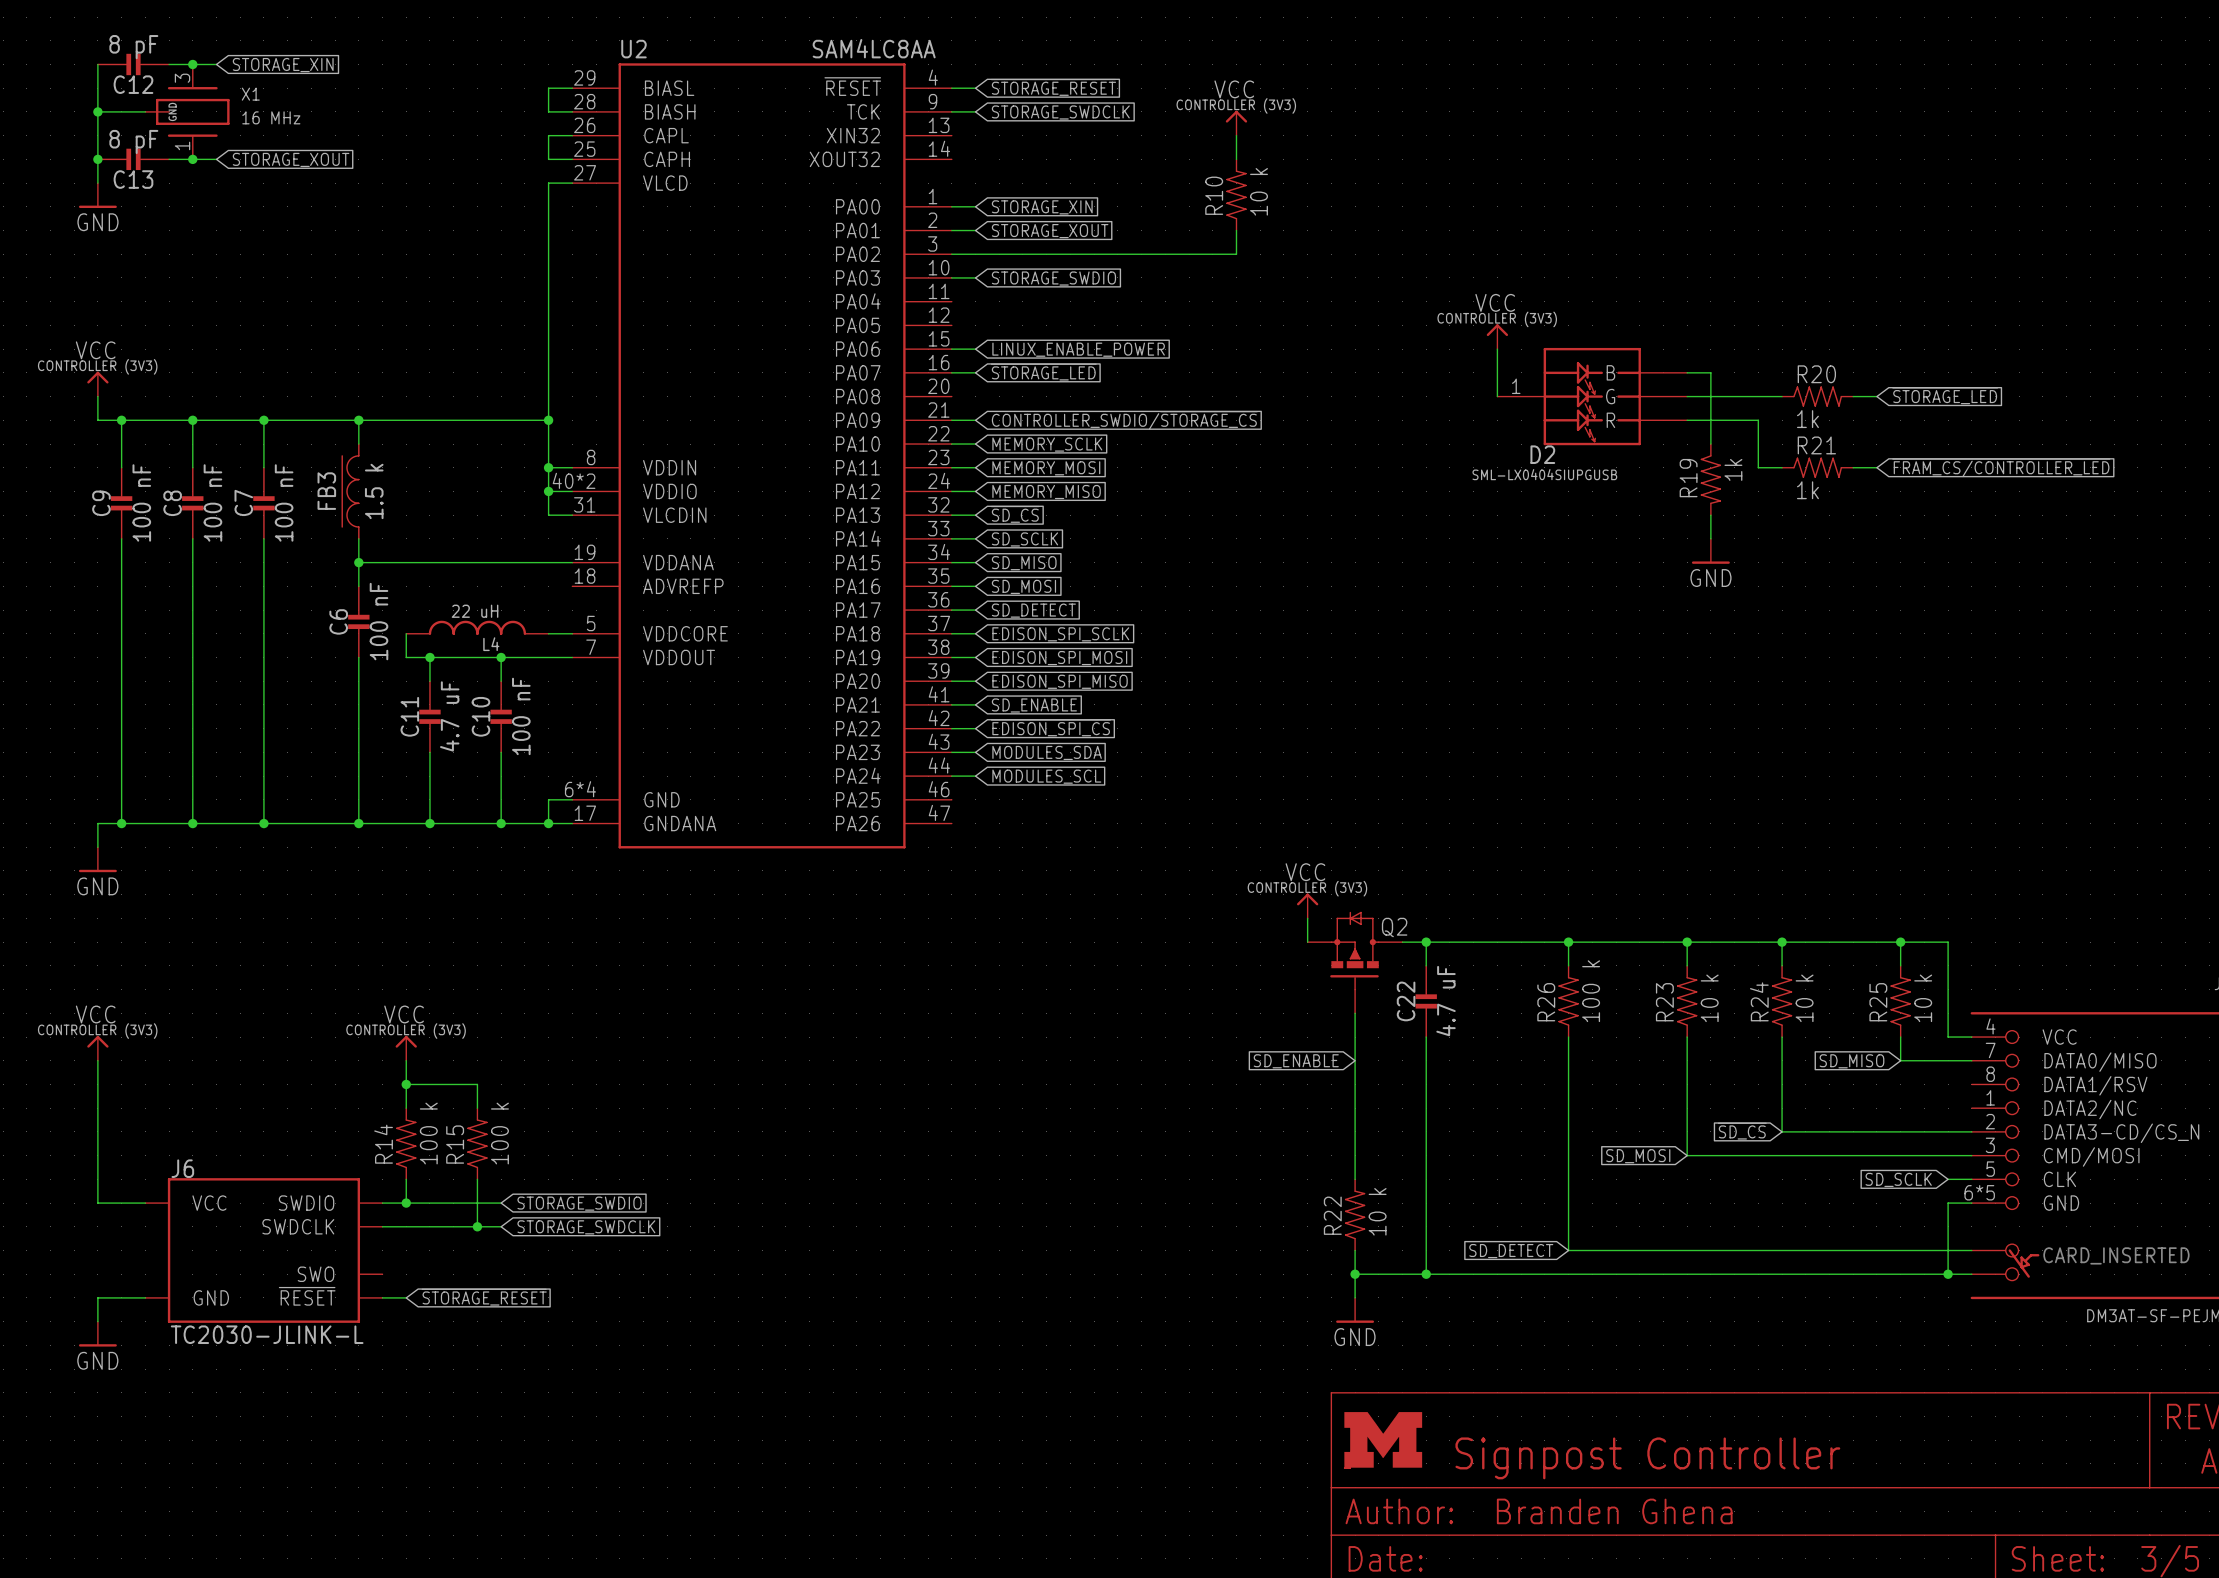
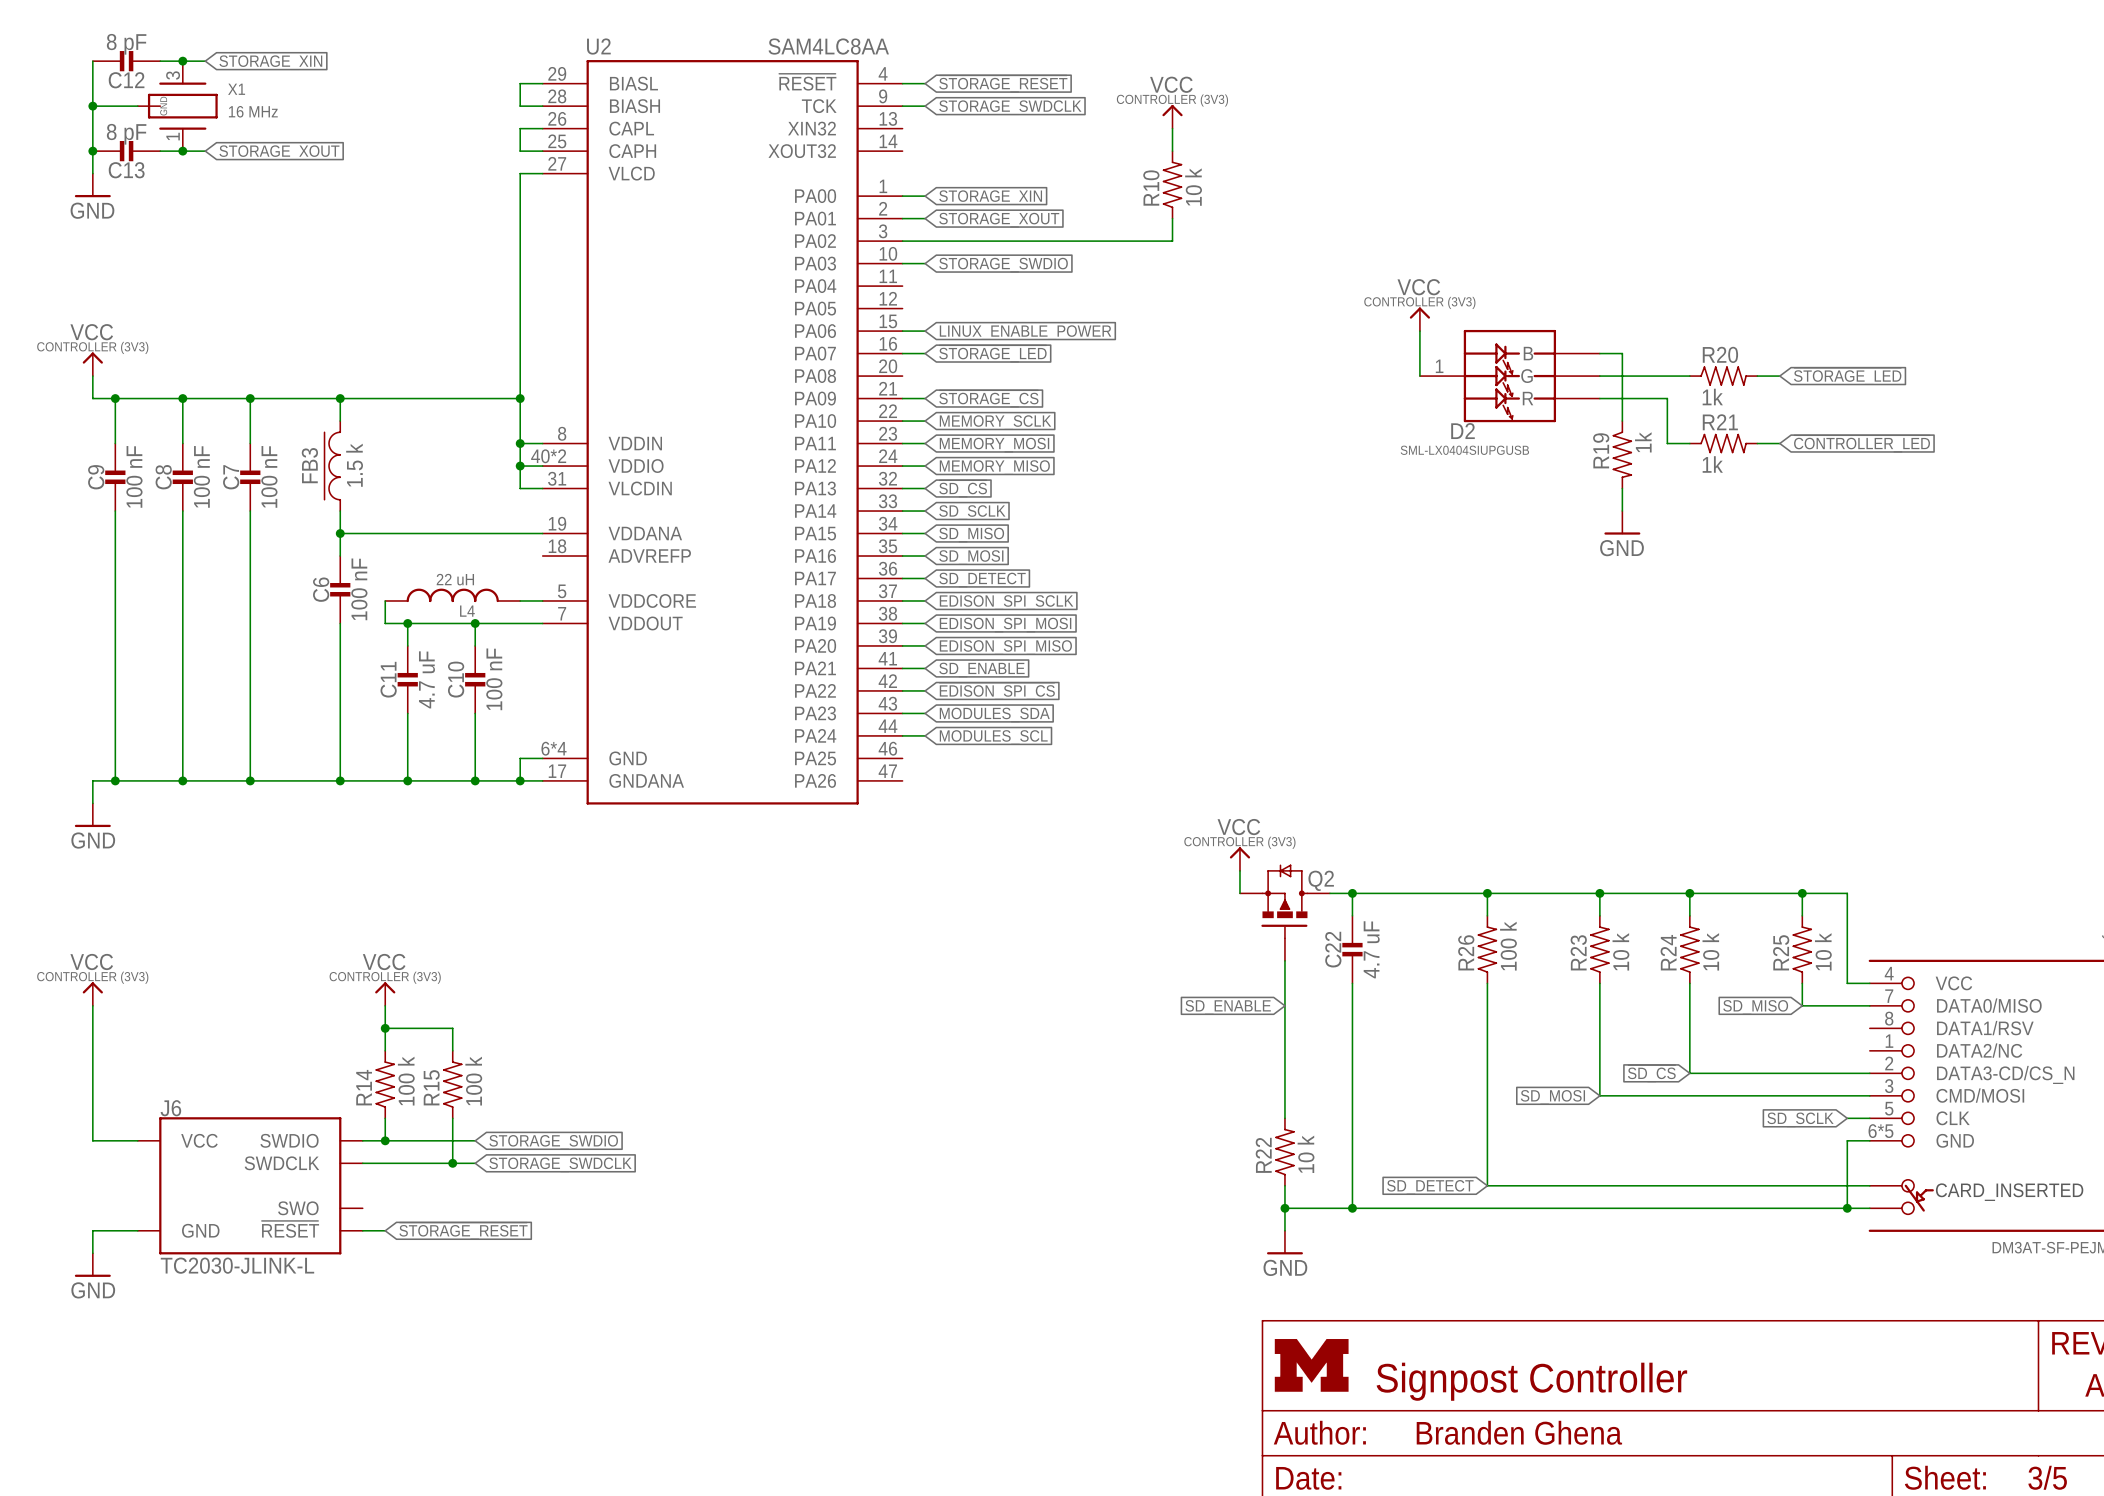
global label: CONTROLLER_SWDIO/~{STORAGE_CS} (1124, 420) -> ~{STORAGE_CS} (988, 398)
global label: ~{FRAM_CS/CONTROLLER_LED} (2001, 467) -> ~{CONTROLLER_LED} (1862, 443)

